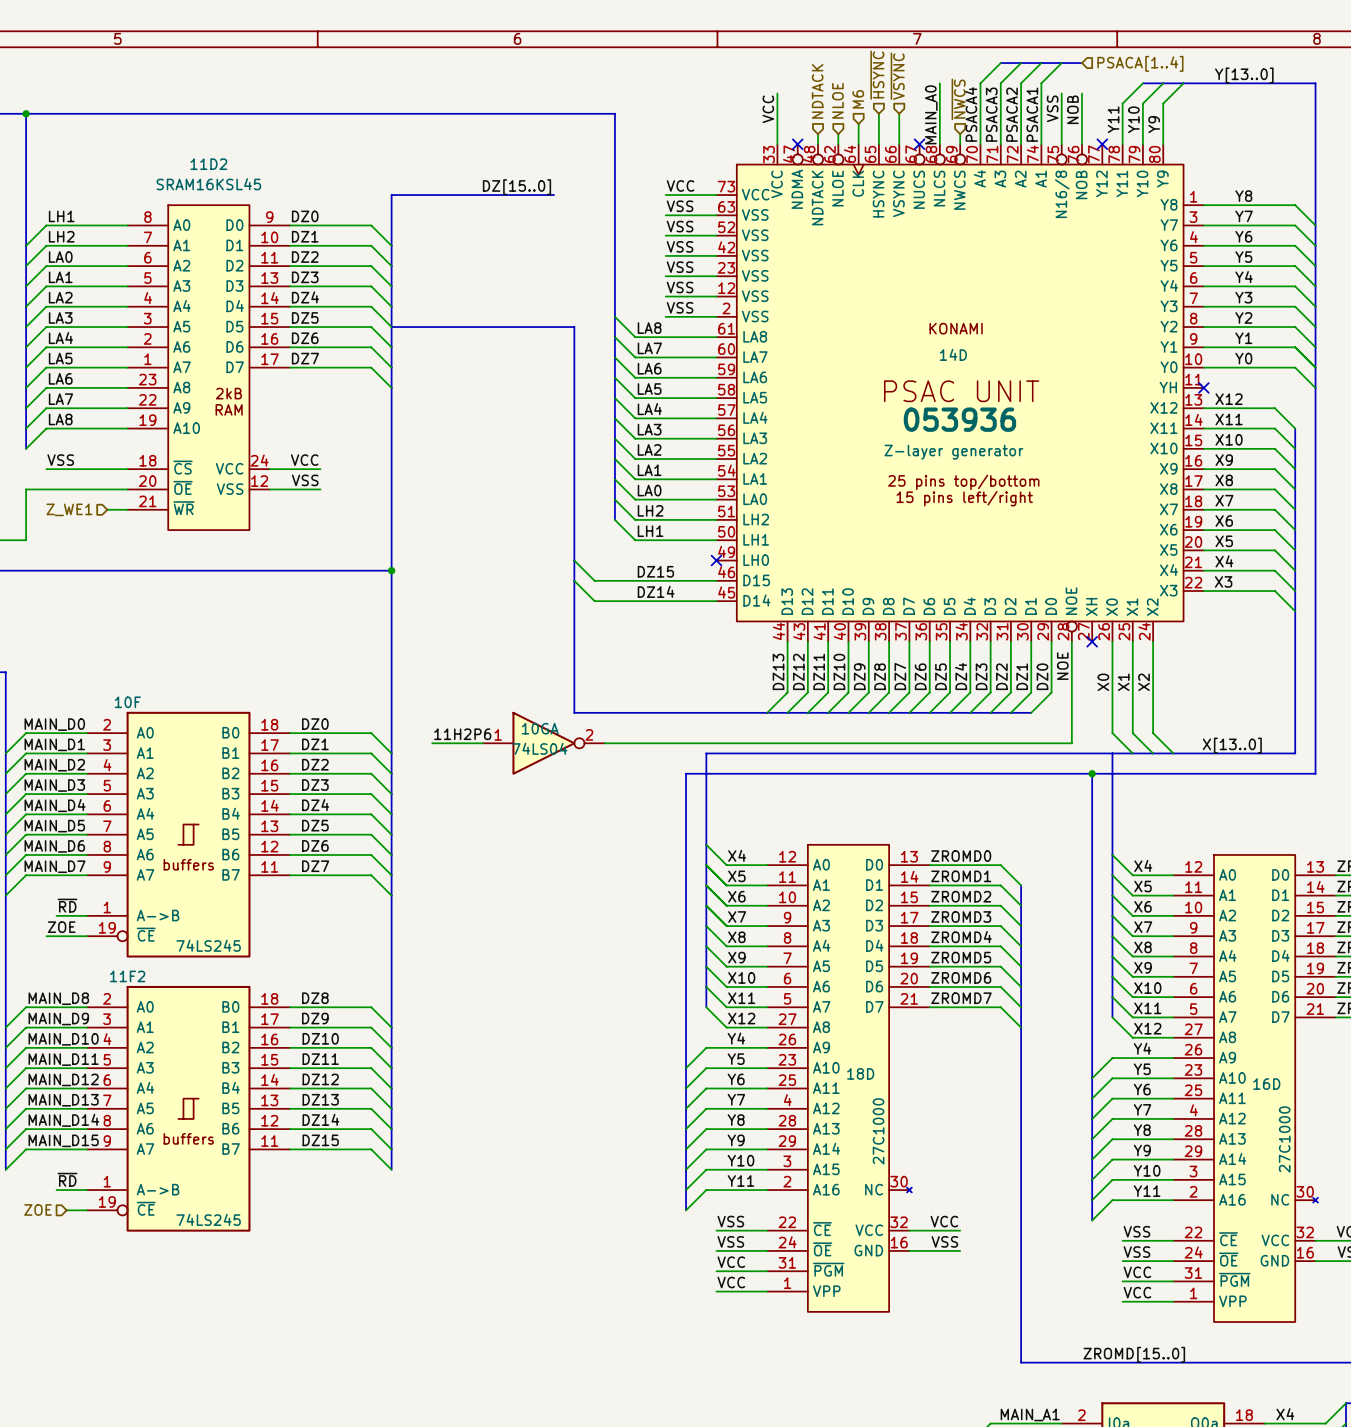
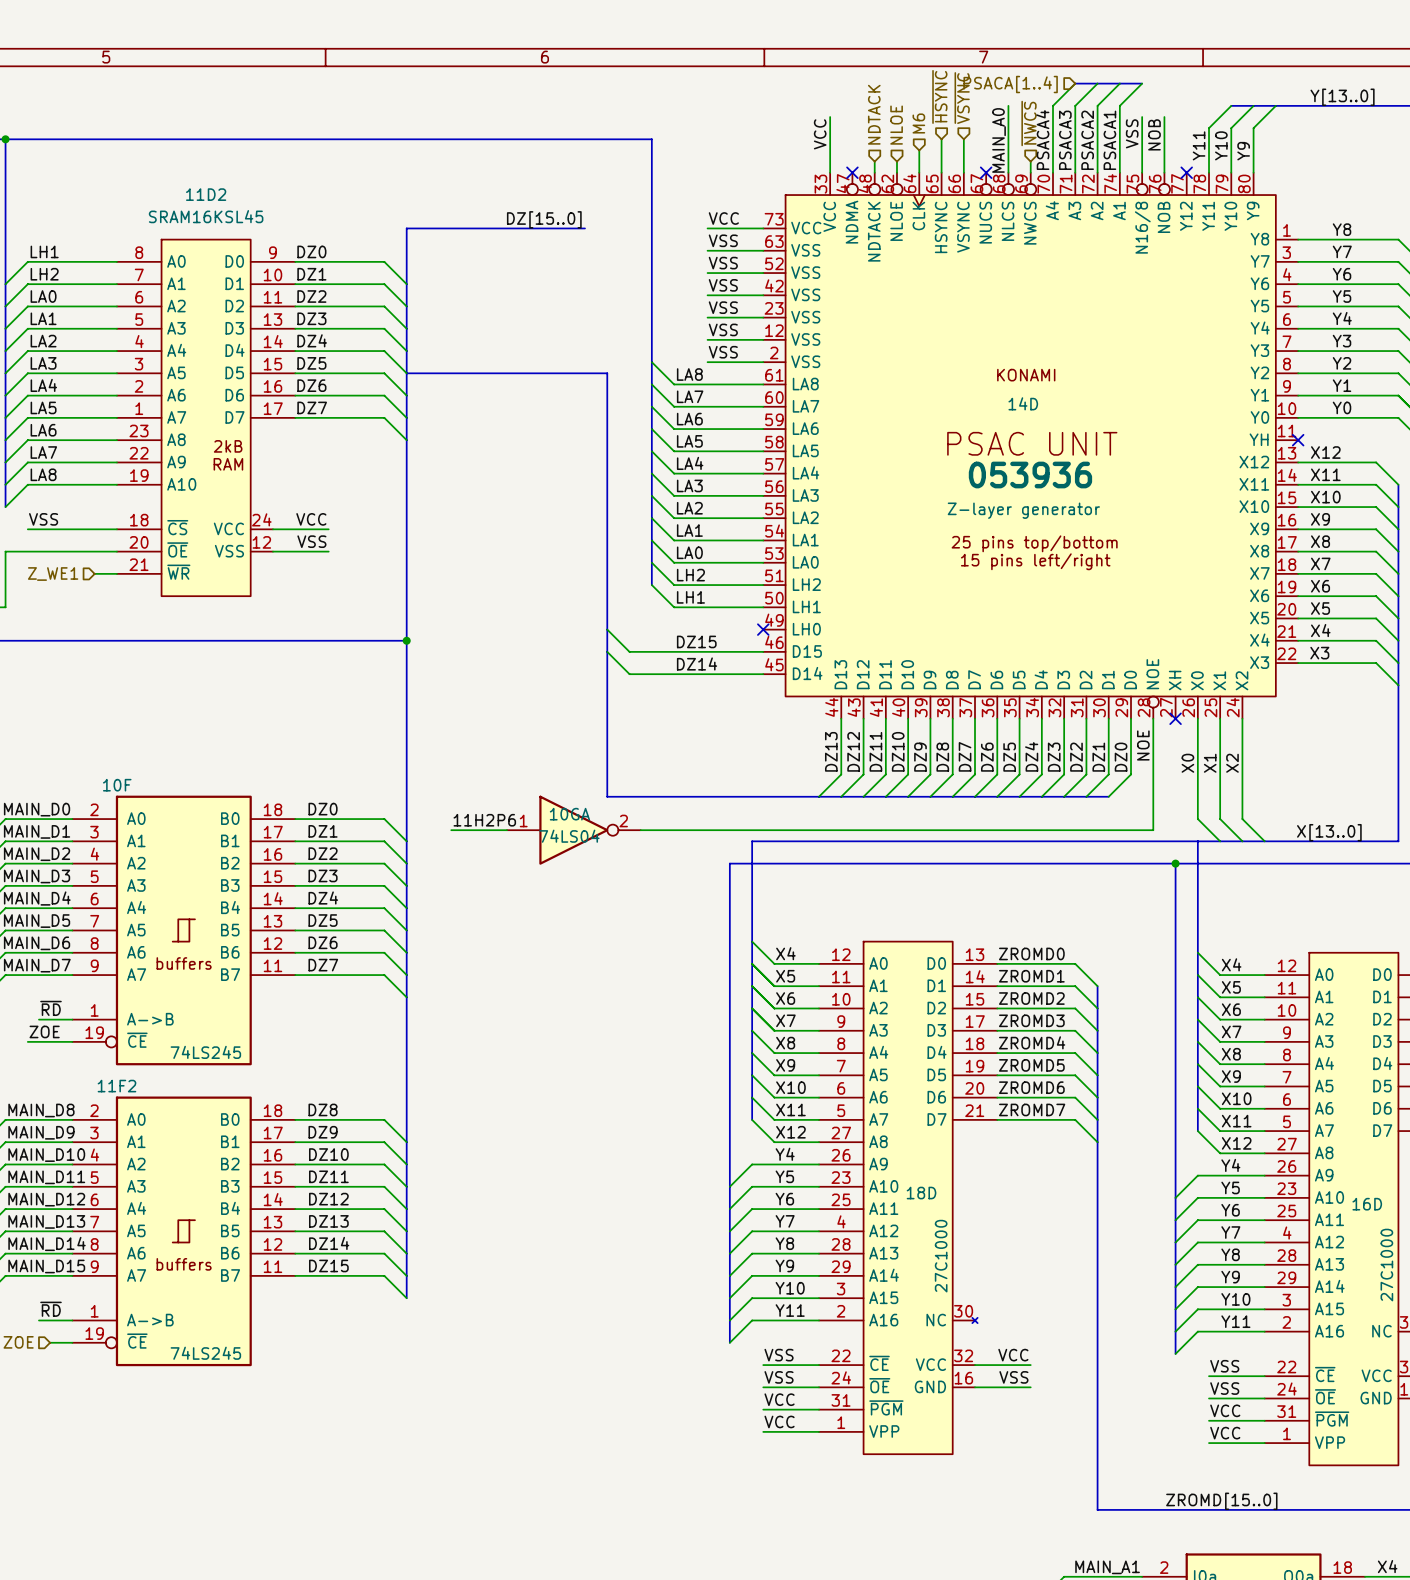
bus: (1061, 63) (1082, 63) -> none
hierarchical label rotation: 0° (1140, 63) -> 180° (1010, 84)
hierarchical label position: PSACA[1..4] (1140, 63) -> PSACA[1..4] (1010, 84)

